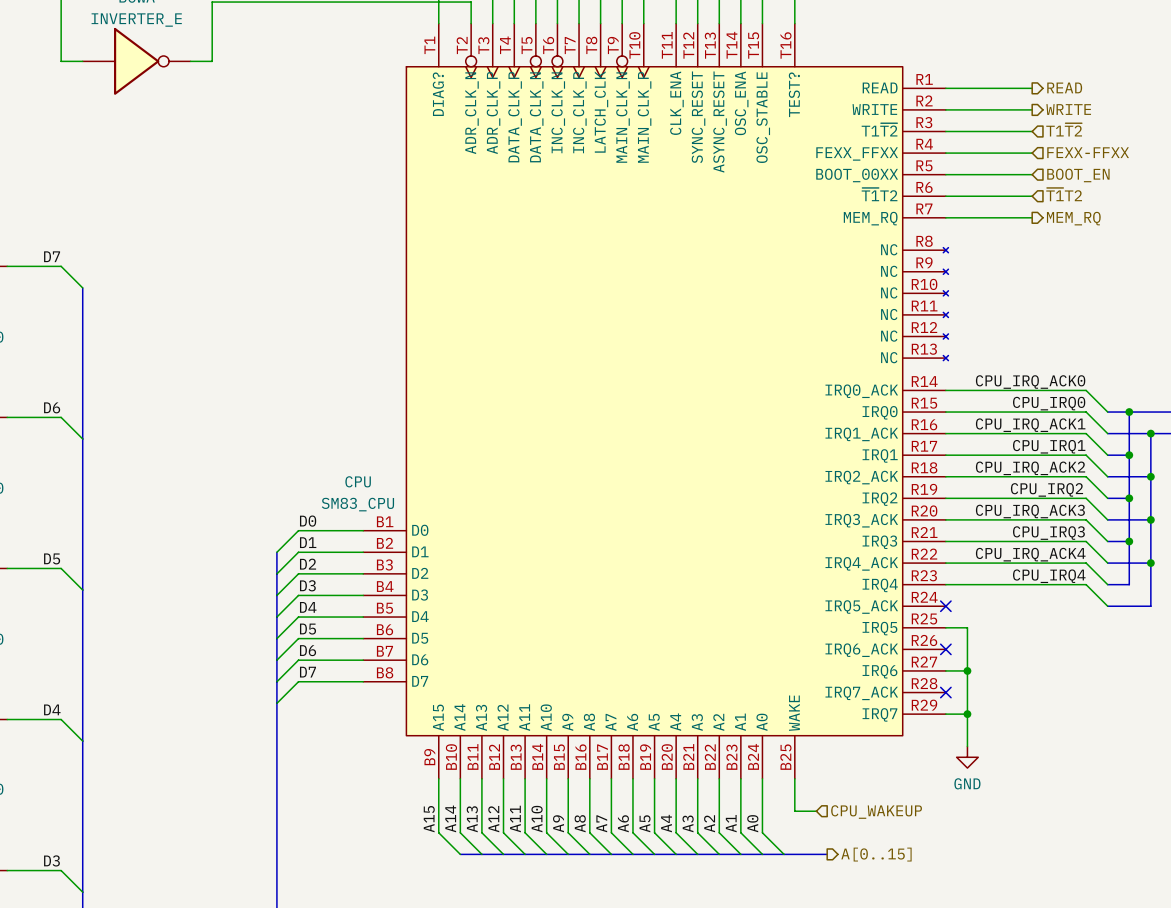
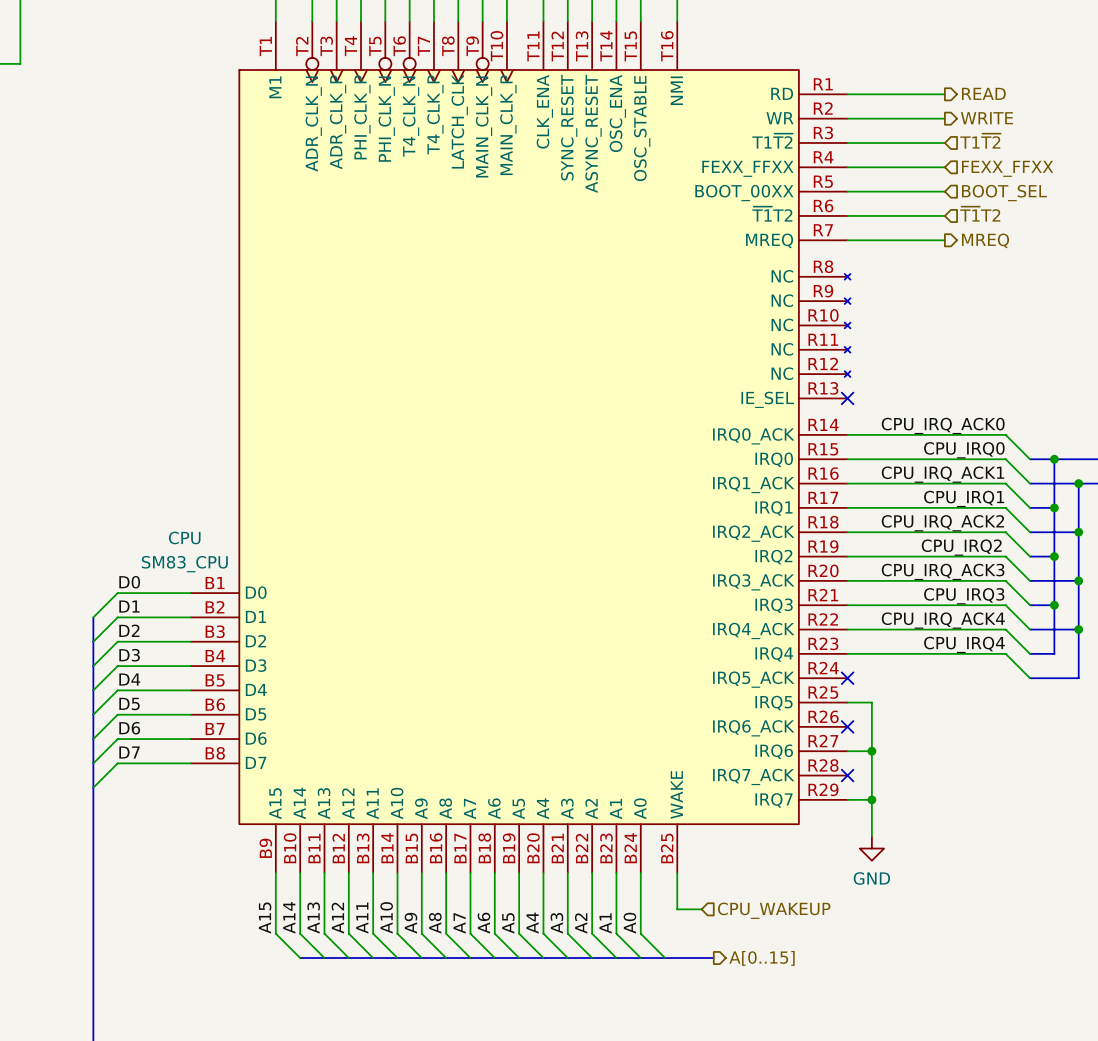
CPU symbol: [363, 23, 949, 779] -> [190, 21, 851, 873]
hierarchical label: FEXX-FFXX (1088, 152) -> FEXX_FFXX (1007, 168)
hierarchical label: BOOT_EN (1078, 175) -> BOOT_SEL (1004, 193)
hierarchical label: MEM_RQ (1073, 218) -> MREQ (985, 240)
no-connect mark: none -> (847, 398)

